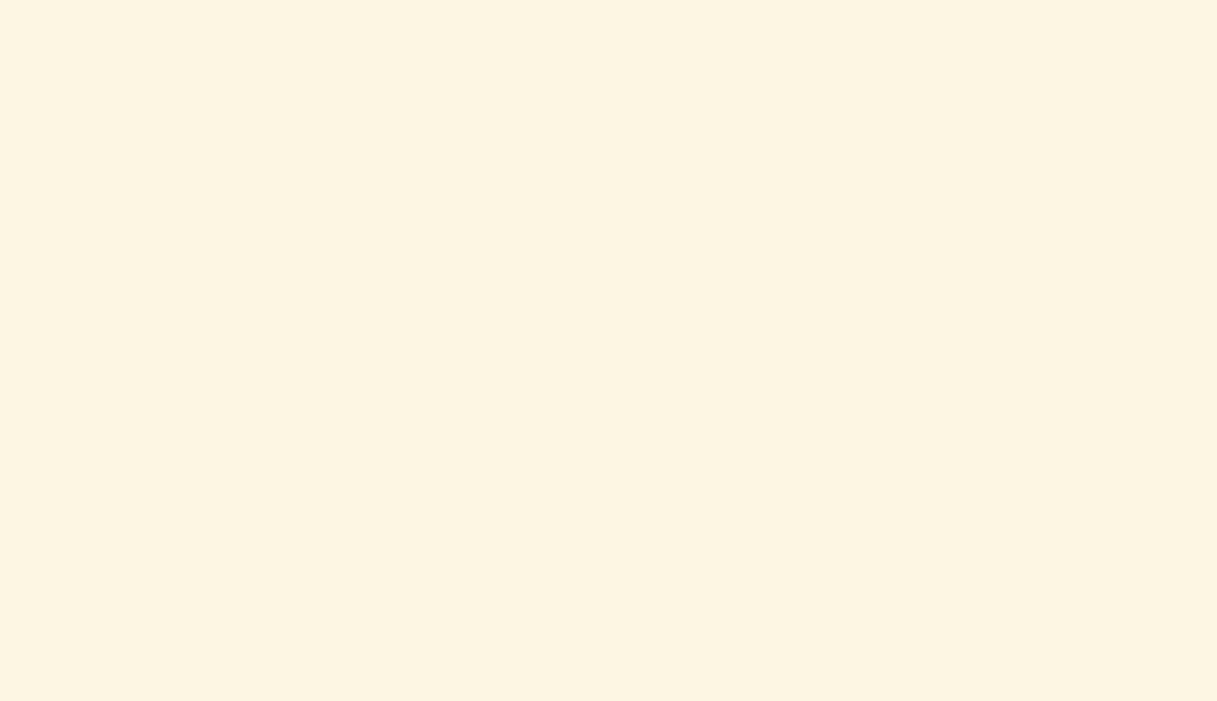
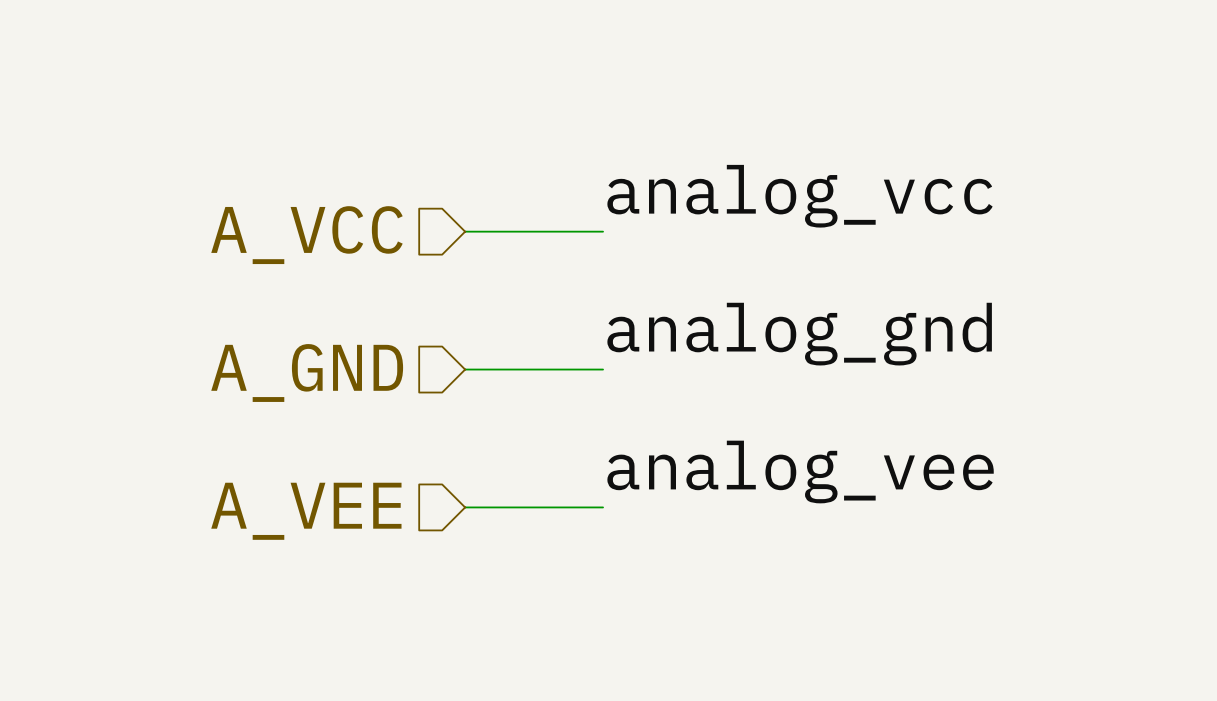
label: none -> analog_vcc (799, 196)
wire: none -> (465, 231) (603, 231)
hierarchical label: none -> A_VCC (306, 235)
label: none -> analog_gnd (799, 334)
wire: none -> (465, 369) (603, 369)
hierarchical label: none -> A_GND (307, 373)
label: none -> analog_vee (800, 472)
hierarchical label: none -> A_VEE (306, 511)
wire: none -> (465, 507) (603, 507)

